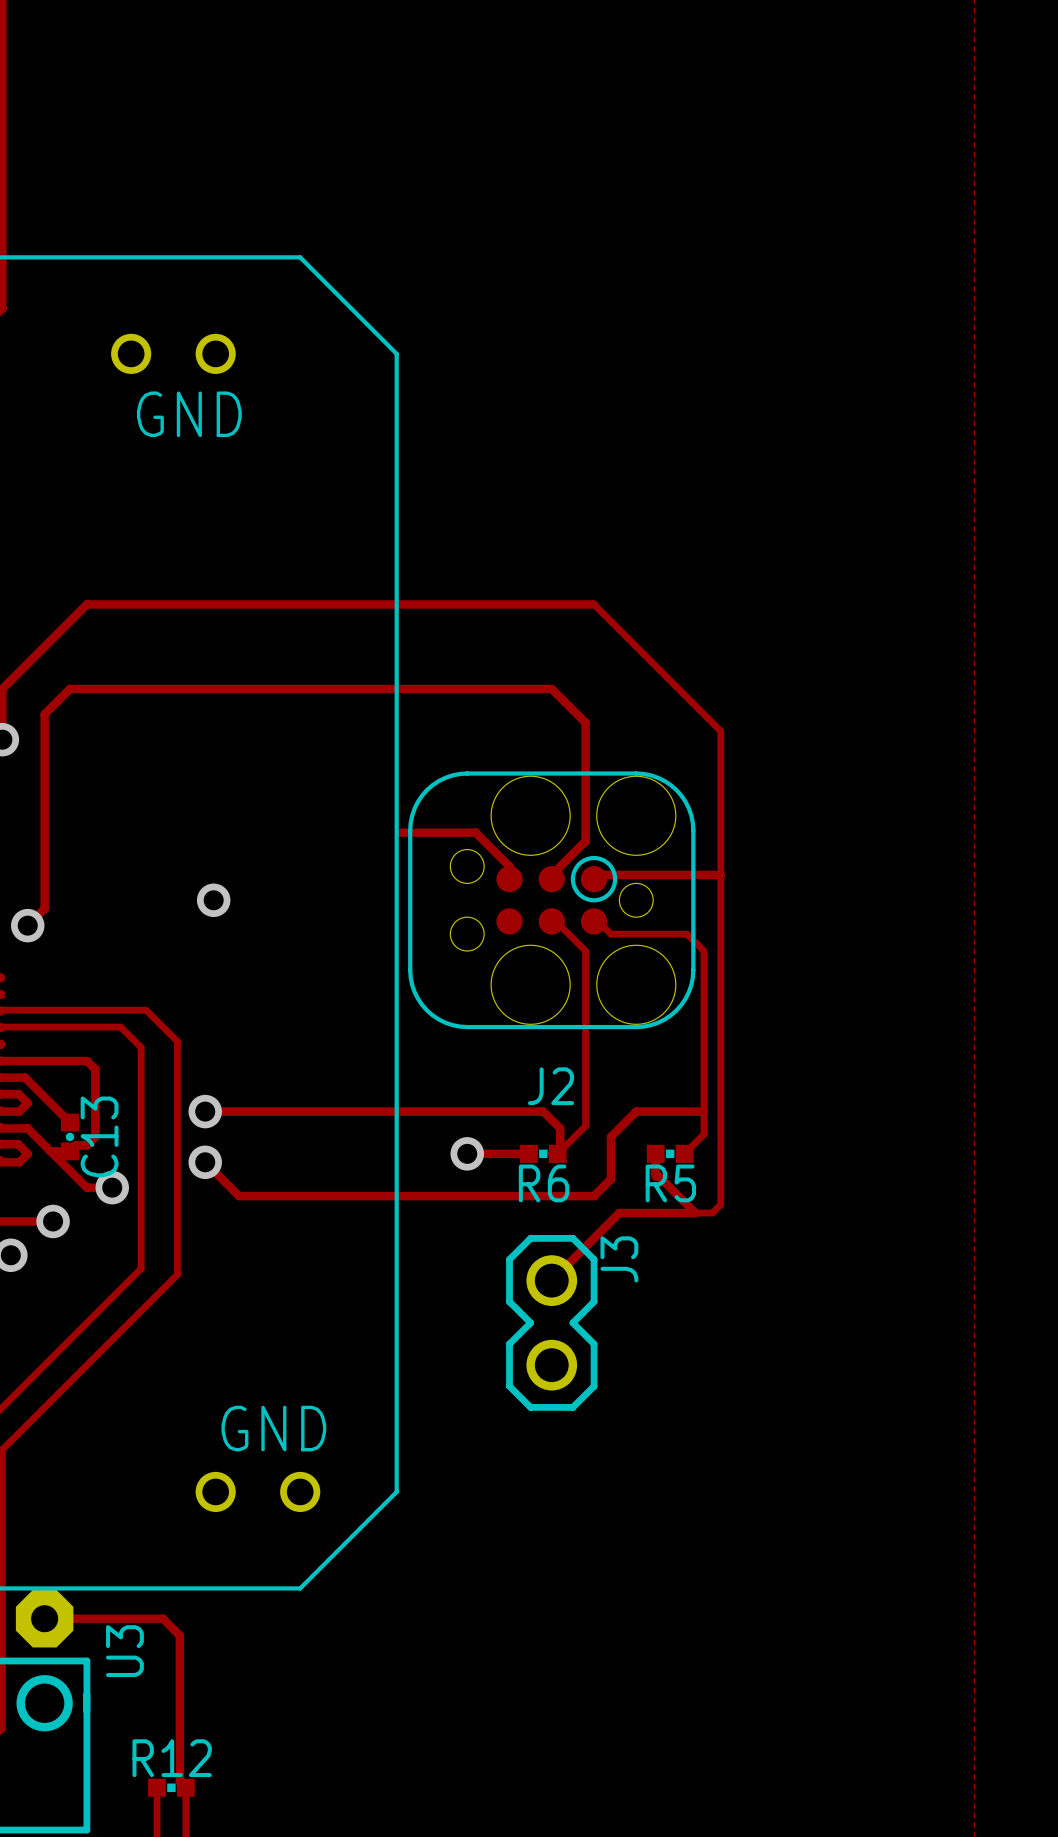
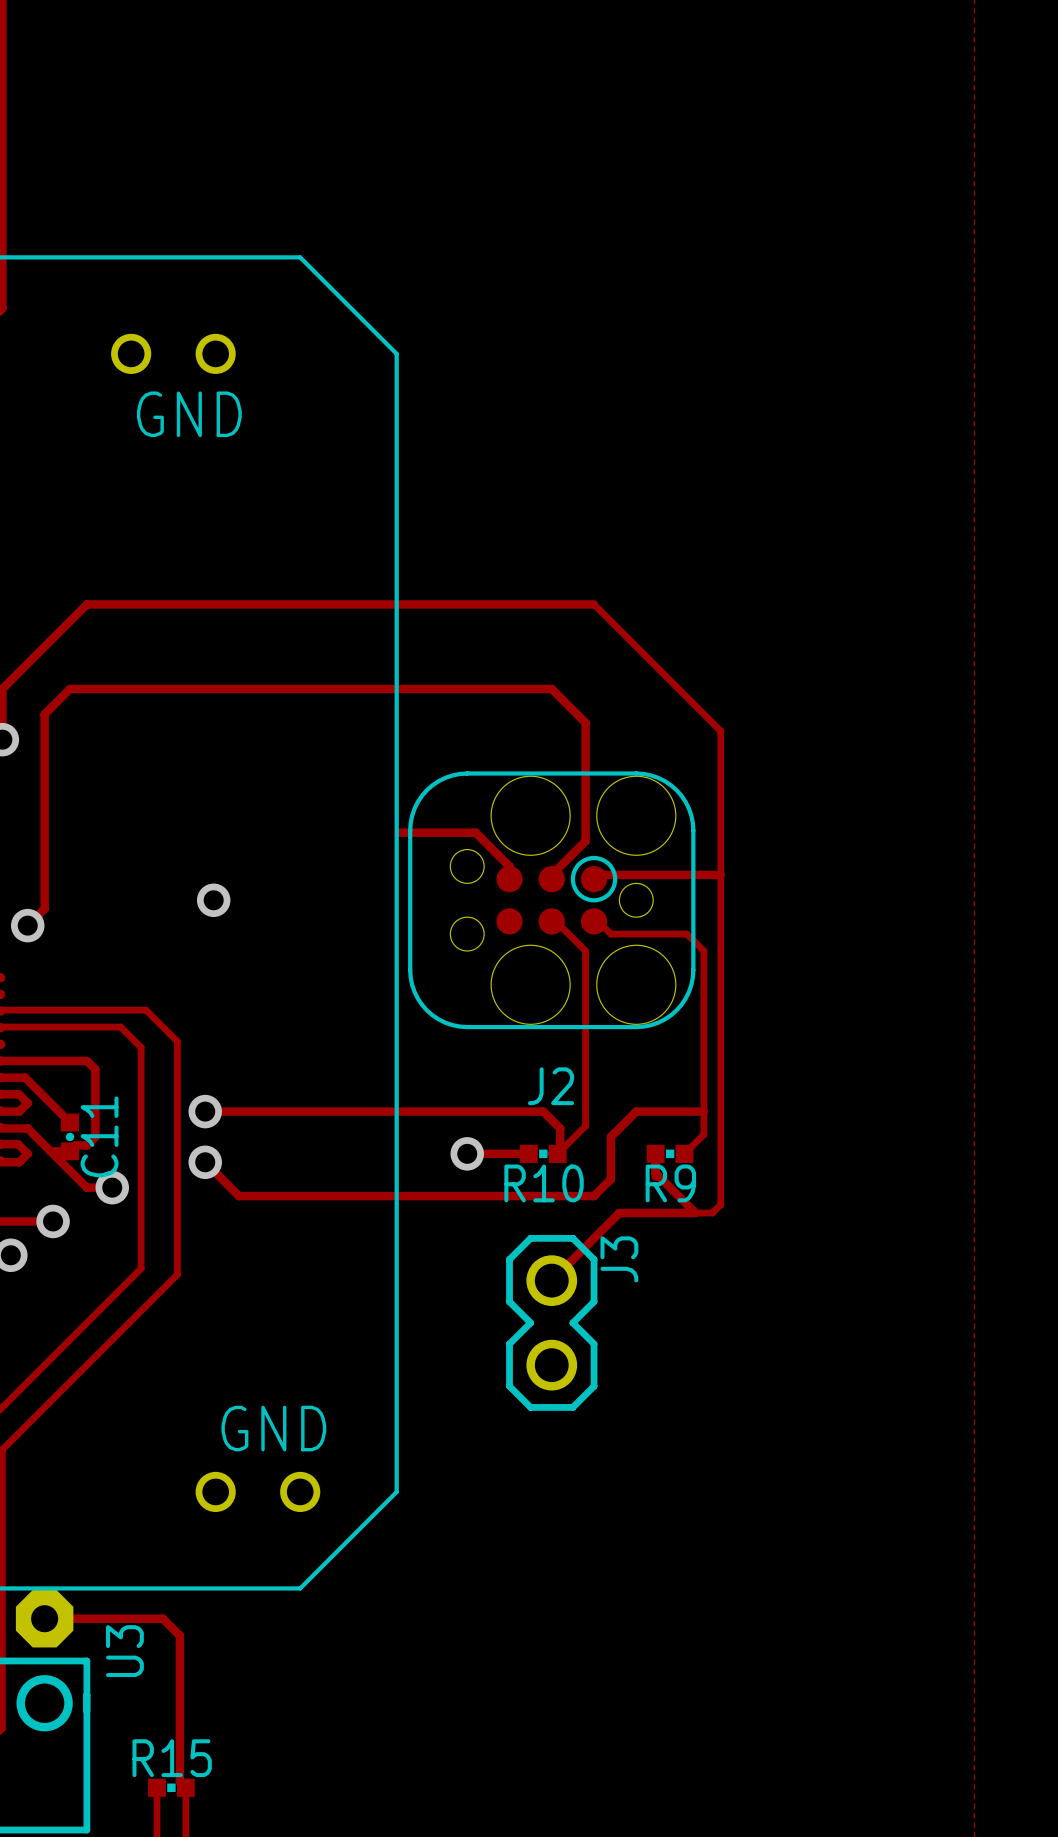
C13 name: C13 (99, 1136) -> C11 (99, 1136)
R6 name: R6 (544, 1183) -> R10 (544, 1183)
R5 name: R5 (670, 1183) -> R9 (670, 1183)
R12 name: R12 (172, 1758) -> R15 (172, 1758)

